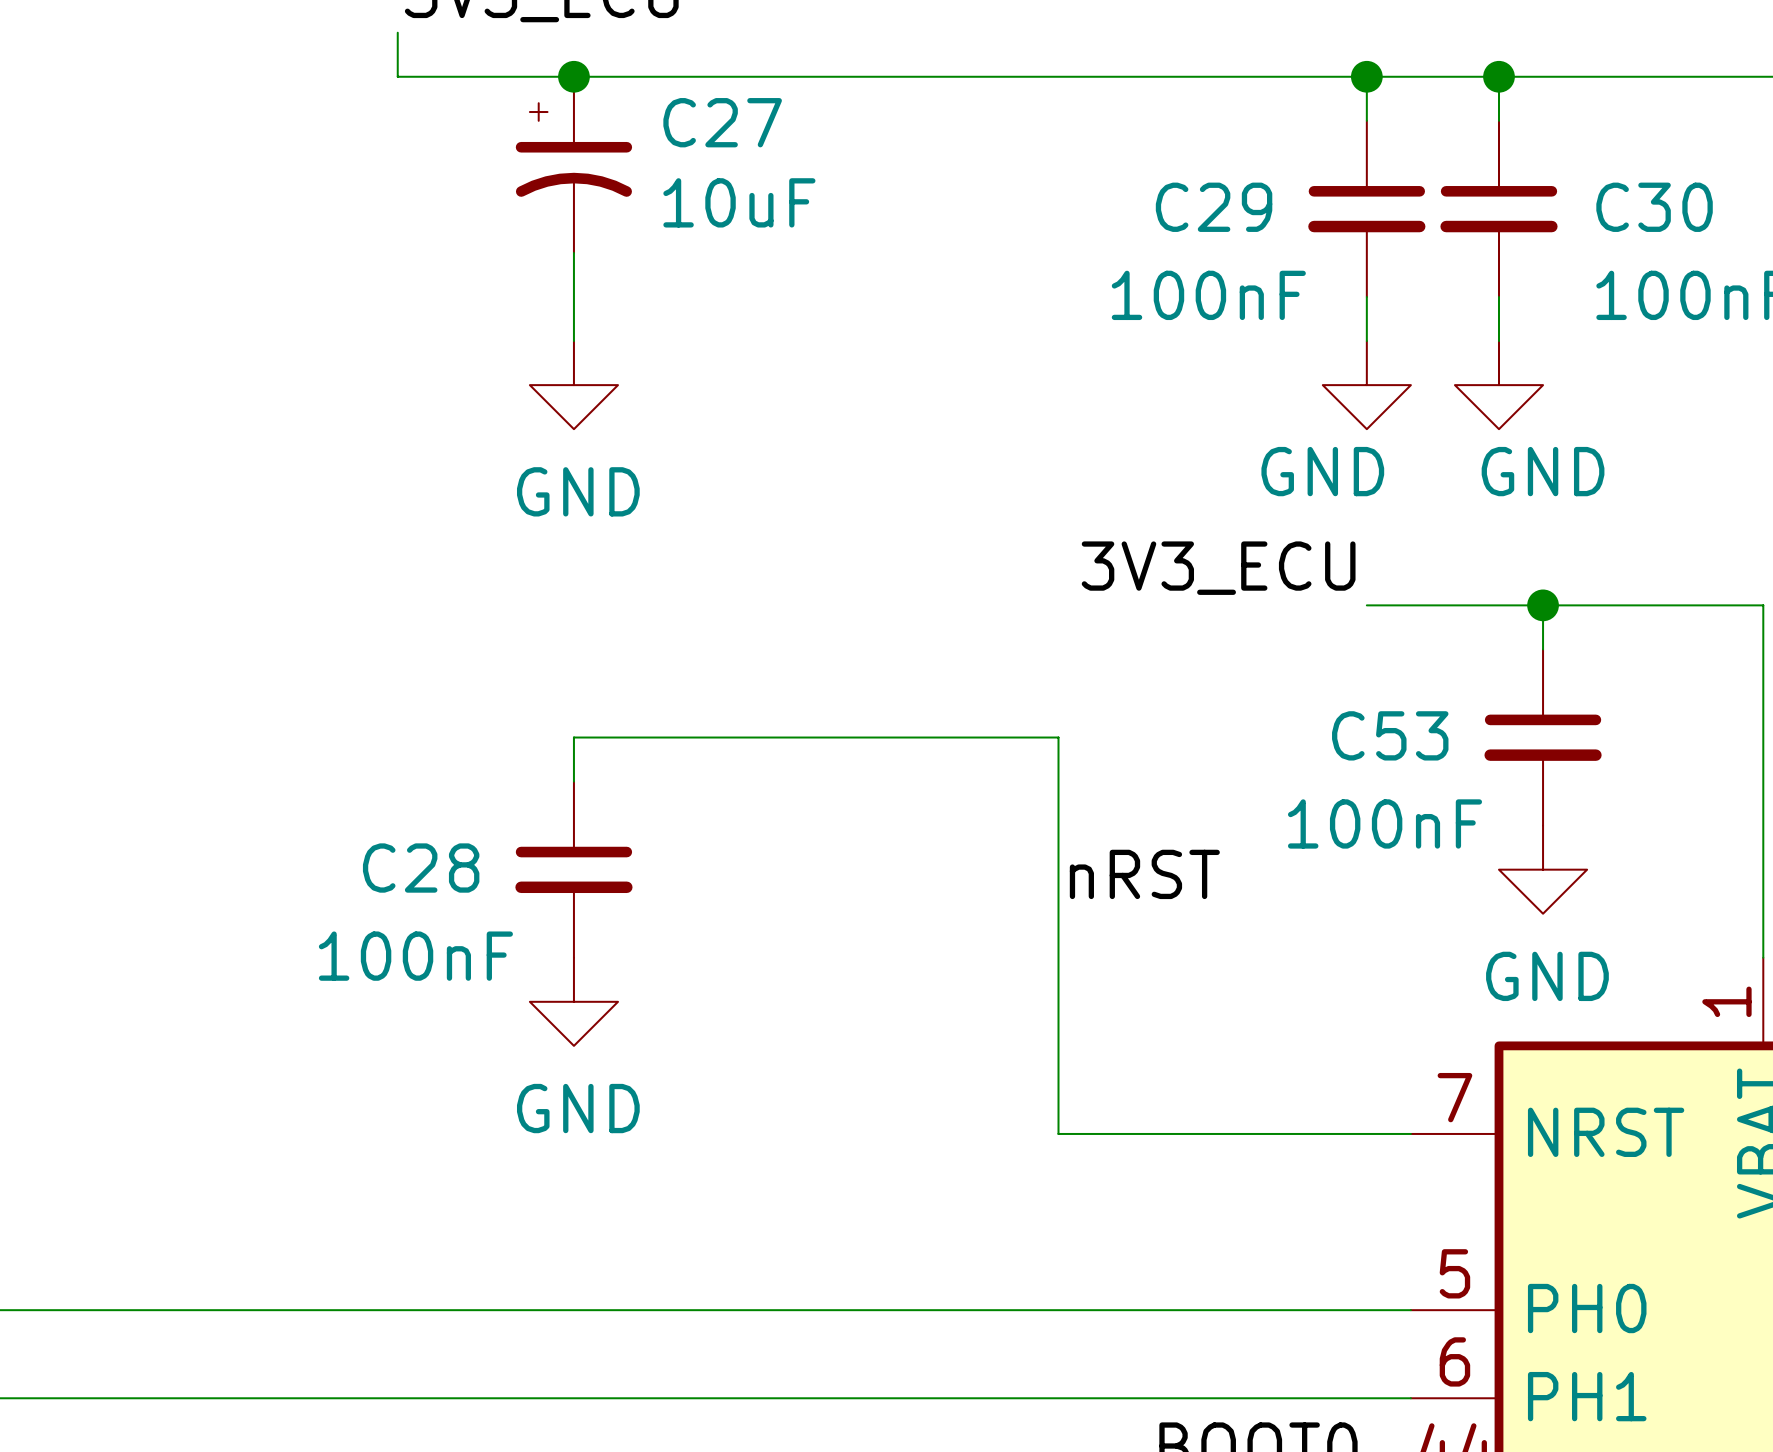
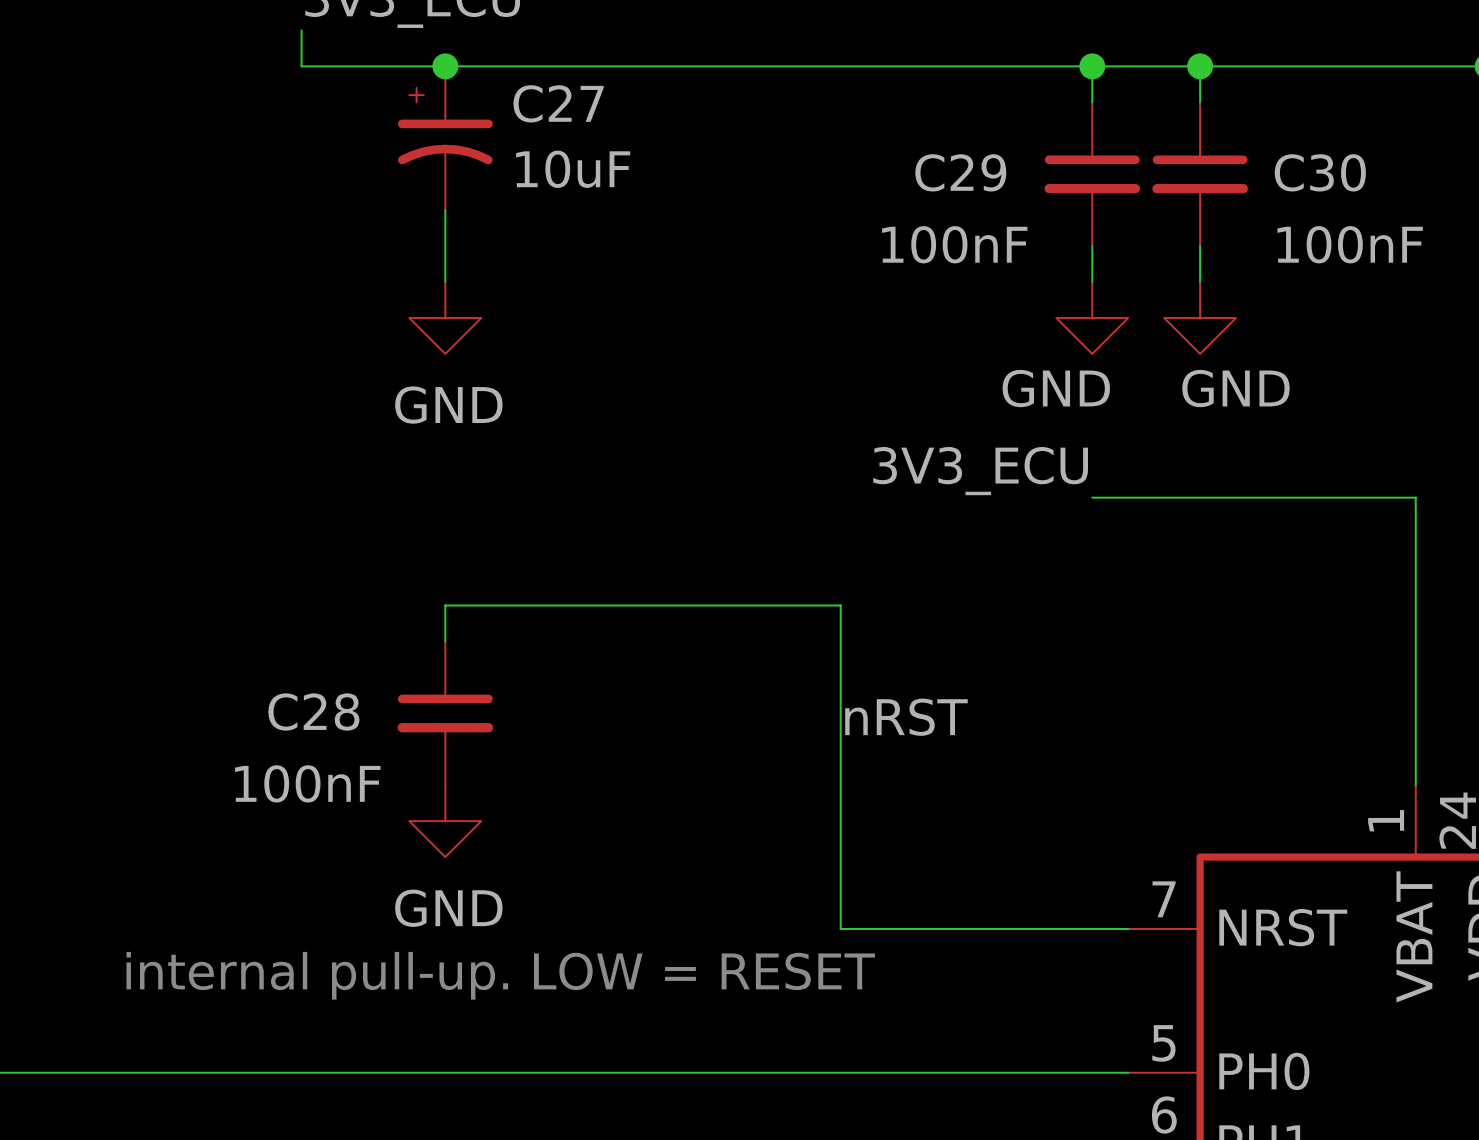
wire: (1543, 605) (1543, 649) -> none
junction: (1543, 605) -> none
C53: 100nF (1543, 737) -> none
power symbol: GND (1543, 869) -> none
text: none -> internal pull-up. LOW = RESET (500, 975)

